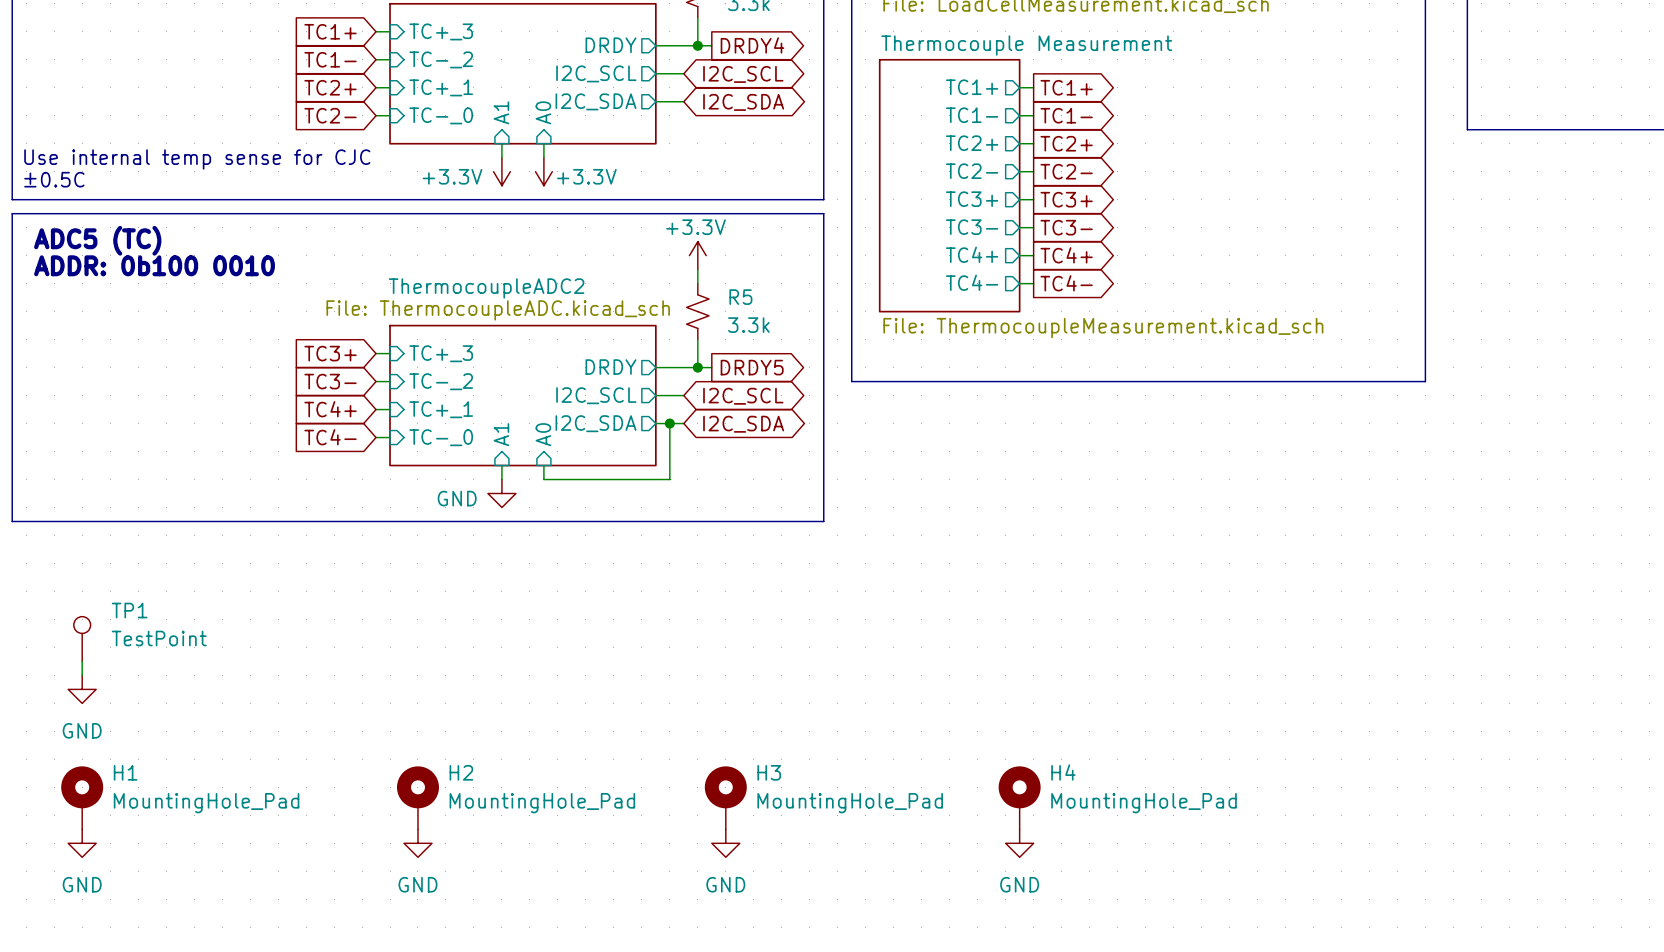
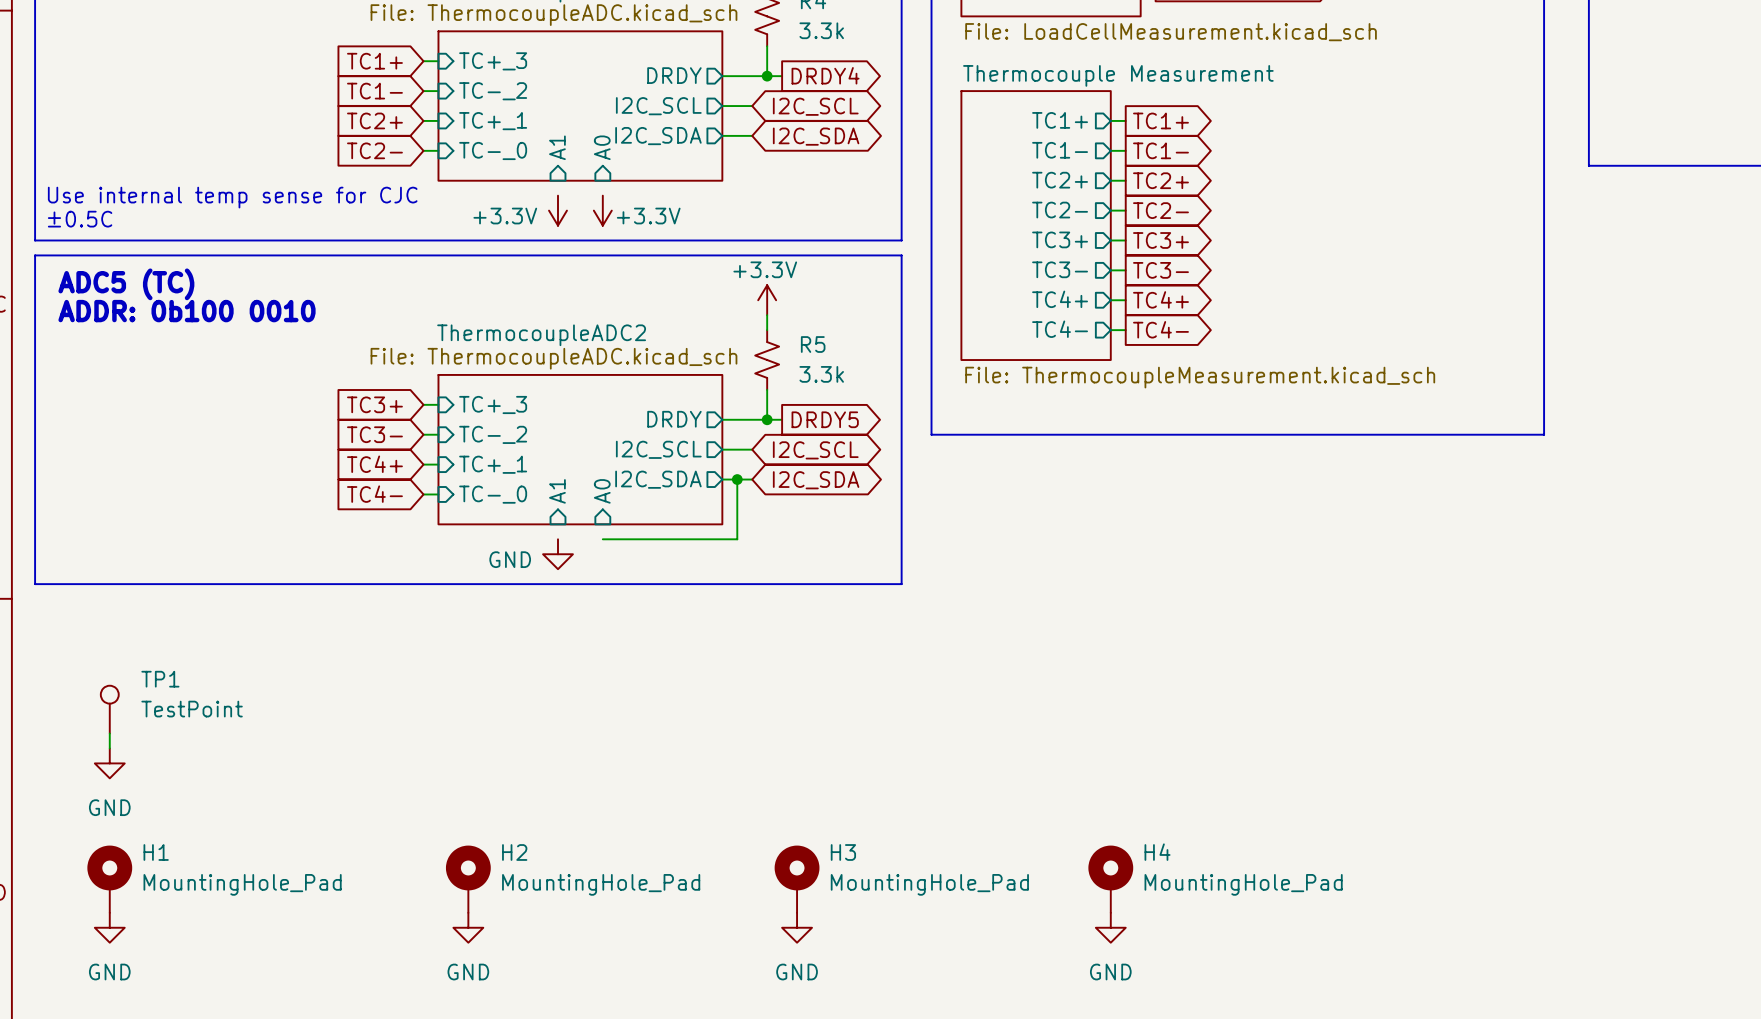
wire: (501, 143) (501, 157) -> none
wire: (543, 143) (543, 157) -> none
wire: (501, 465) (501, 479) -> none
wire: (543, 465) (543, 479) -> none

